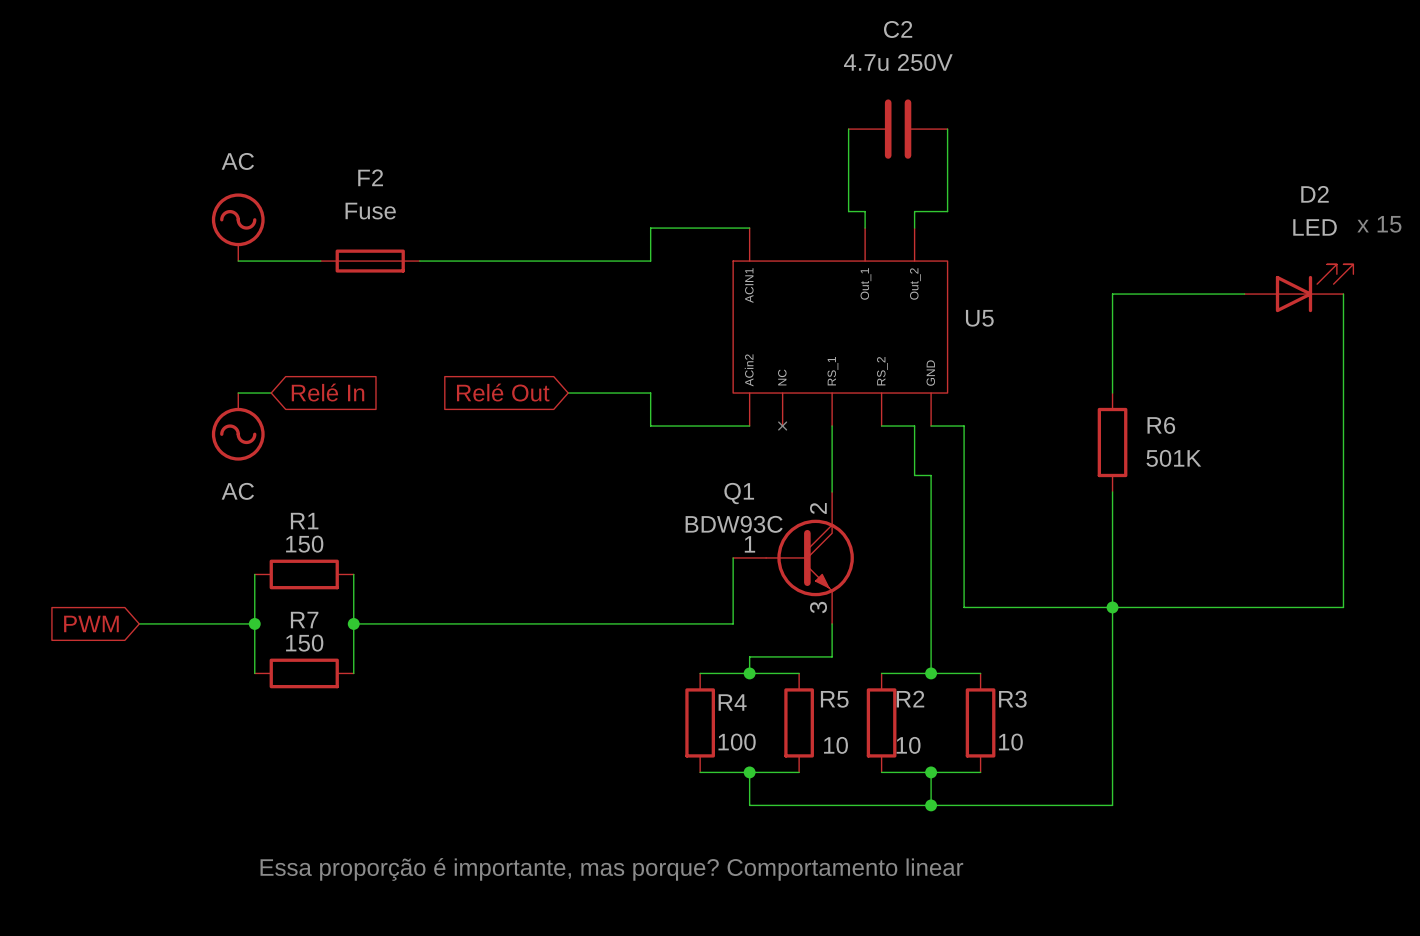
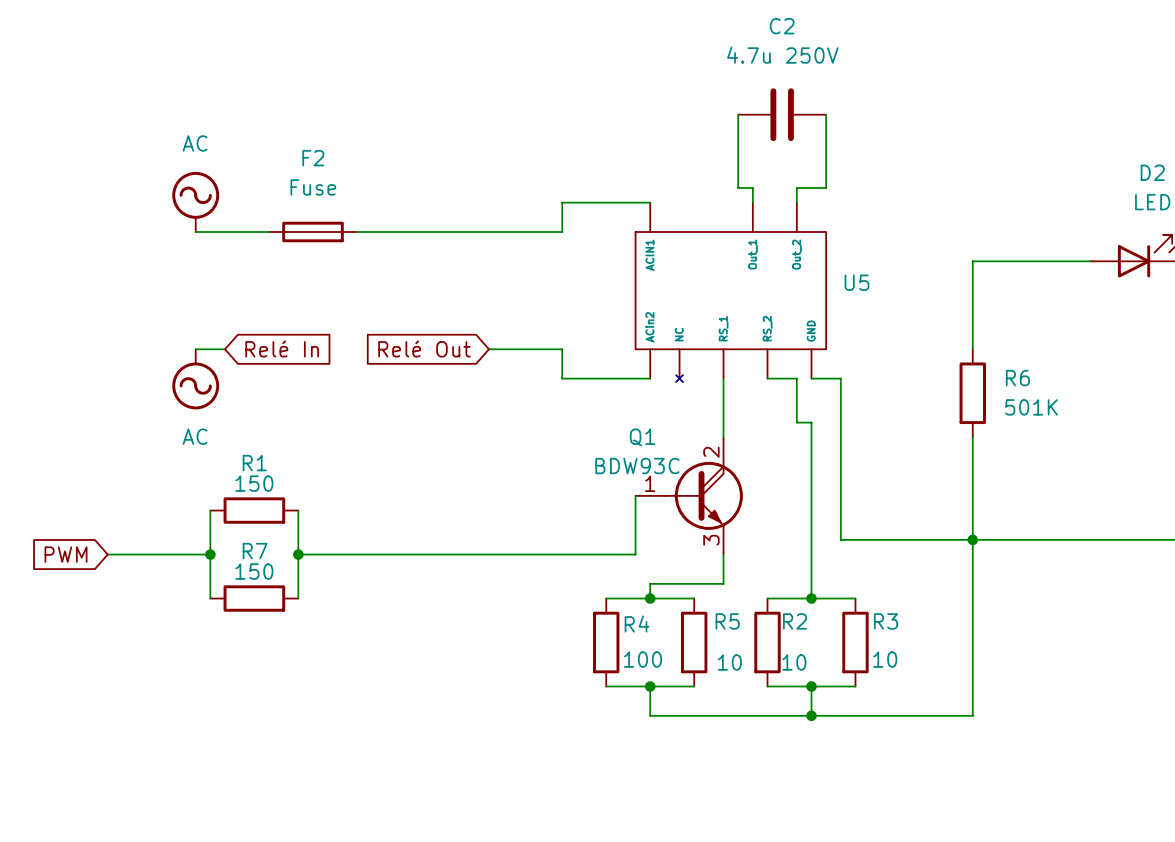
text: Essa proporção é importante, mas porque? Comportamento linear (611, 869) -> none

